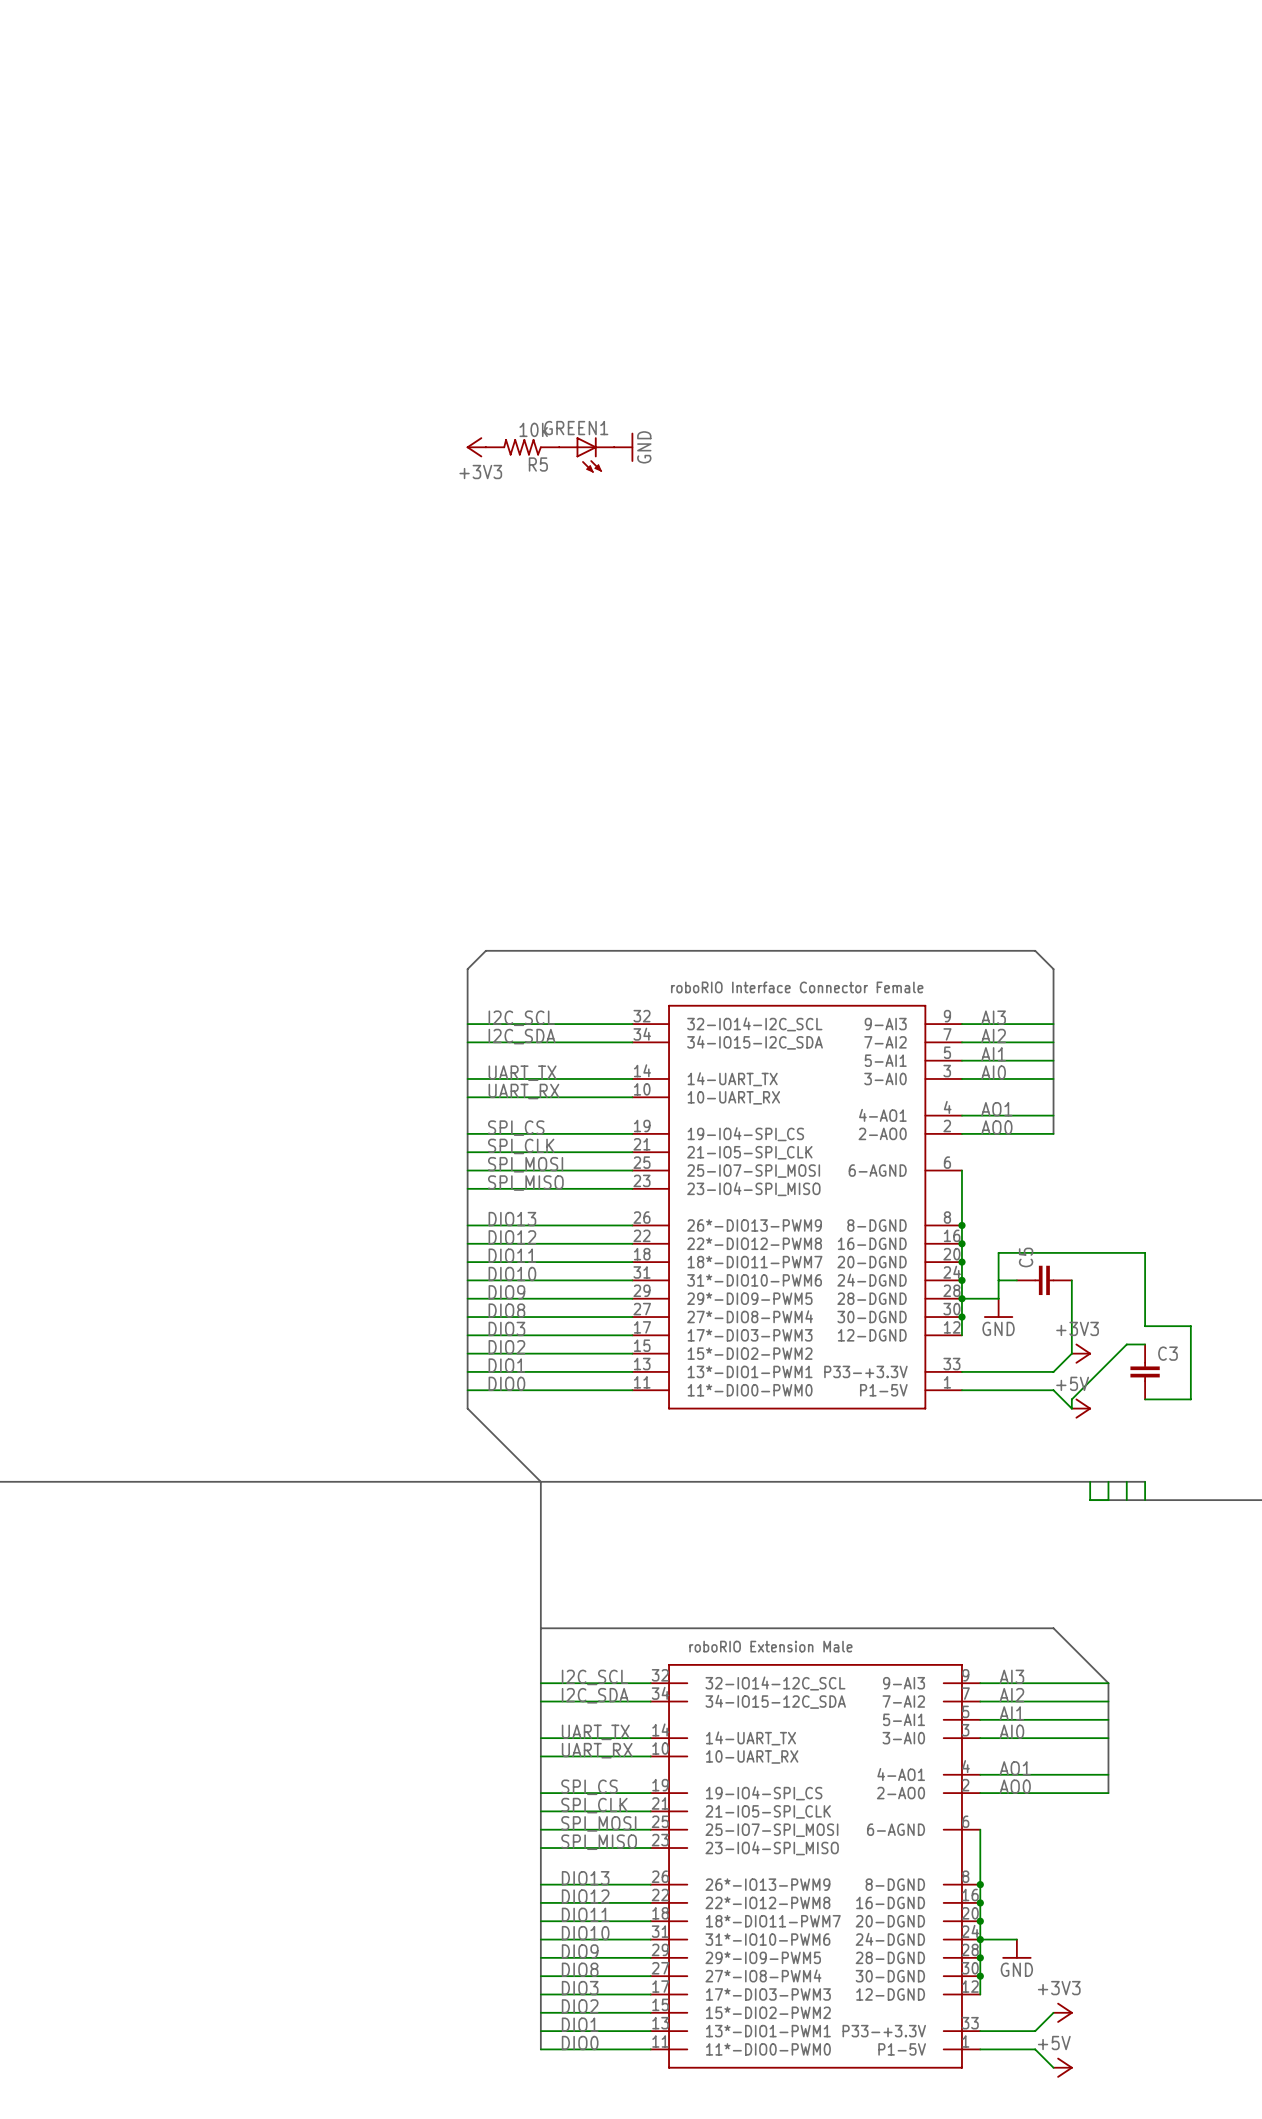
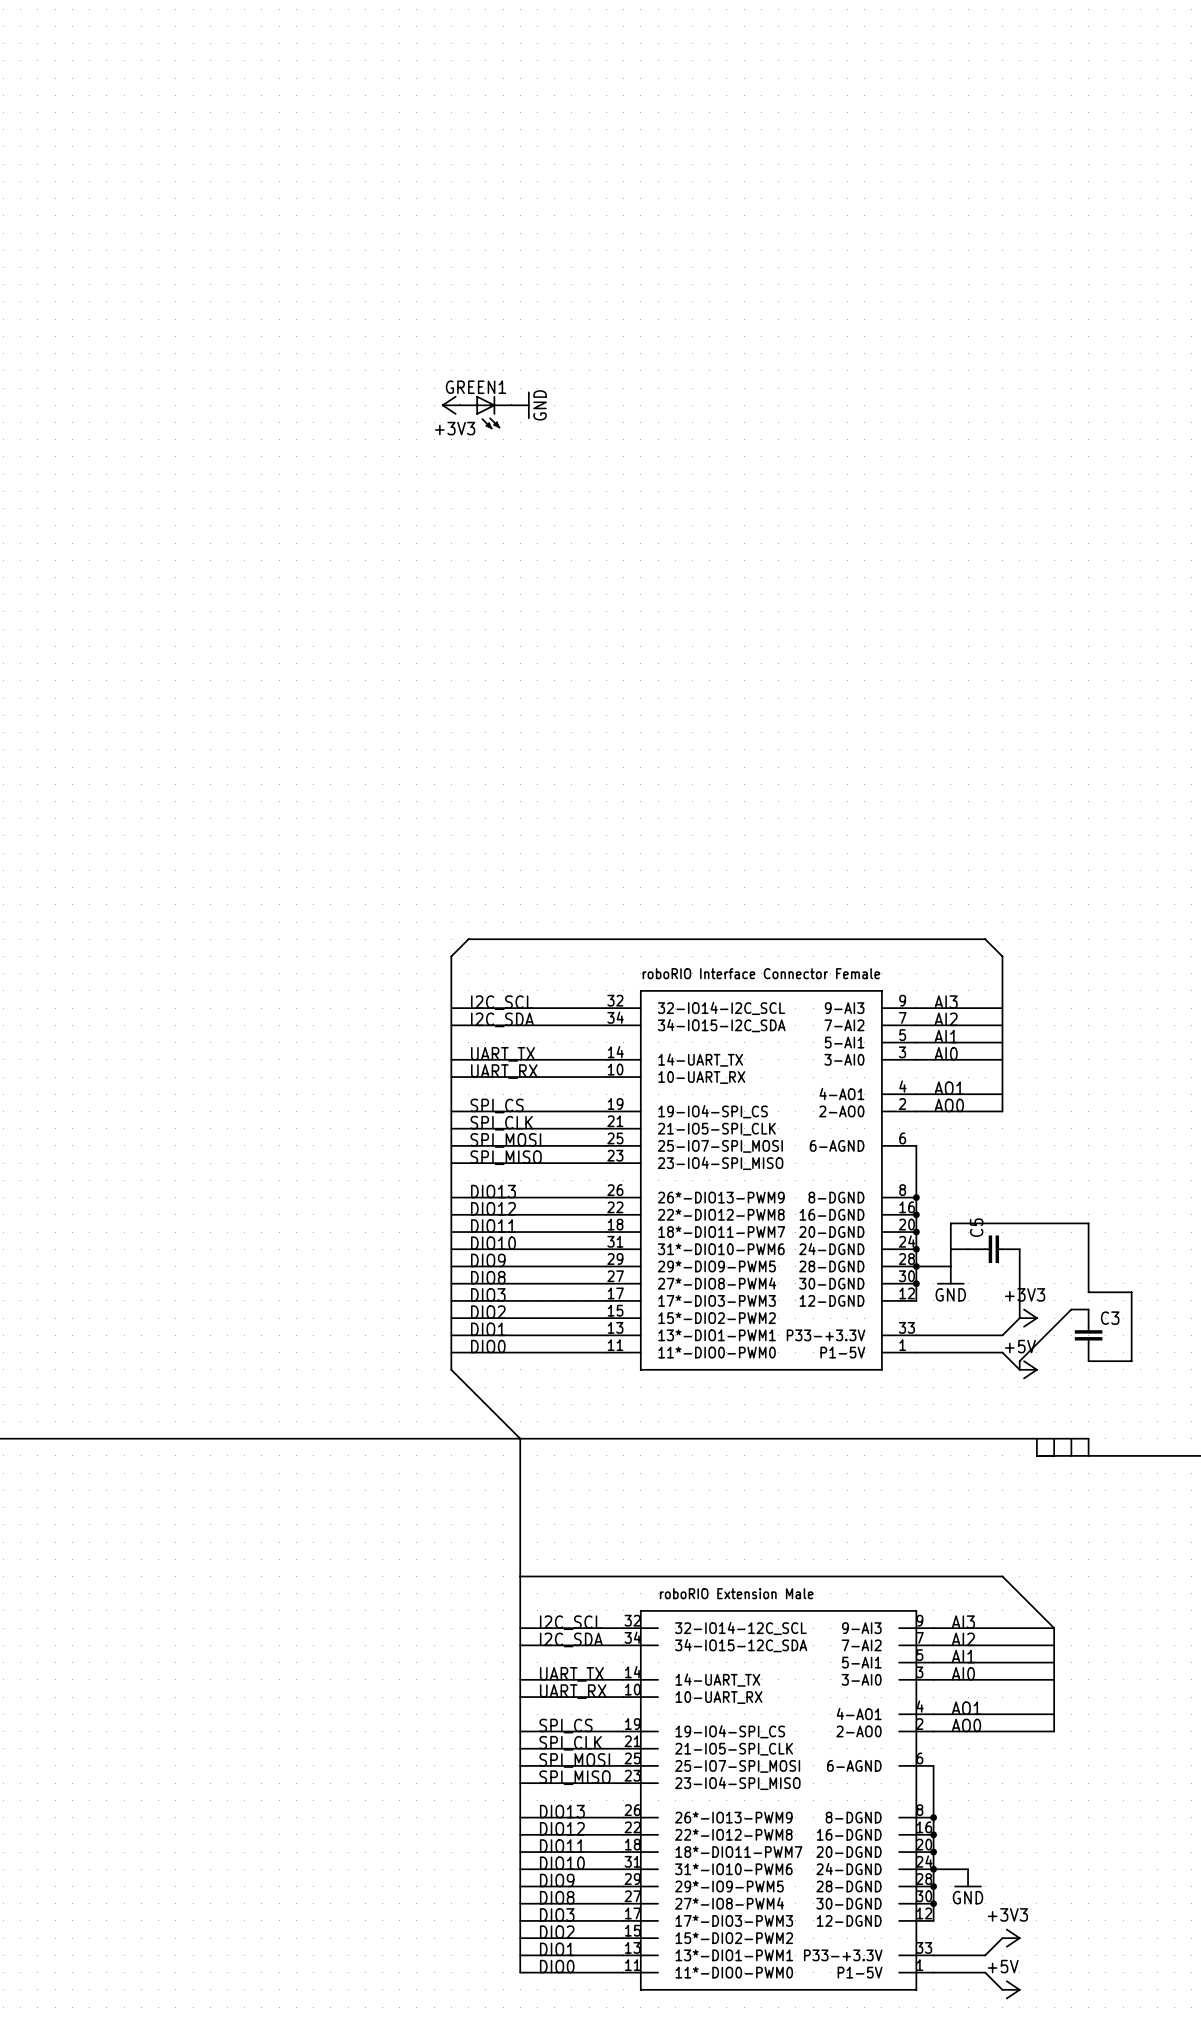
power symbol position: +3V3 (476, 447) -> +3V3 (450, 405)
R5: 10k (522, 447) -> none
power symbol position: GND (623, 447) -> GND (520, 405)
GREEN1 position: (586, 454) -> (485, 412)

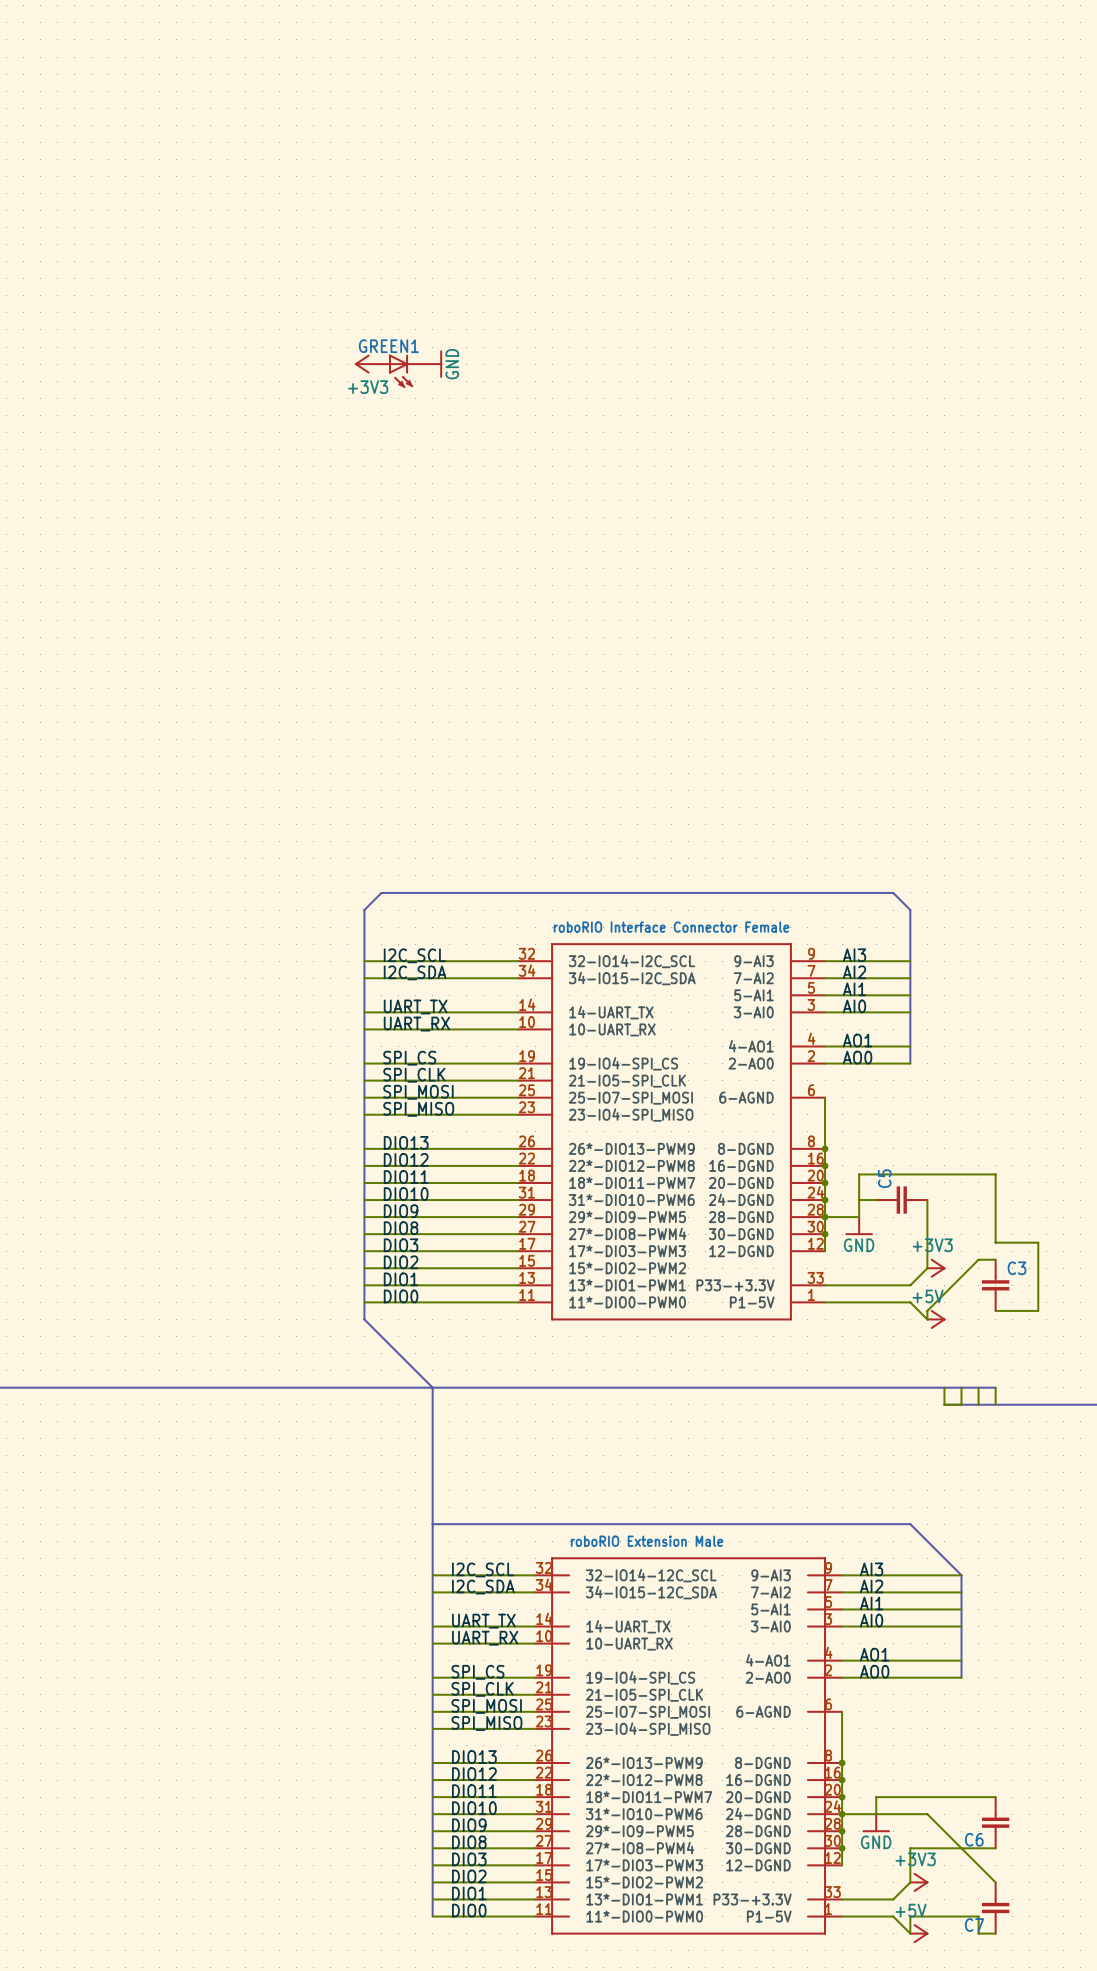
wire: none -> (995, 1797) (876, 1797) (876, 1814) (927, 1814) (995, 1882)
C6: none -> (995, 1822)
wire: none -> (995, 1848) (910, 1848) (910, 1882)
C7: none -> (995, 1908)
wire: none -> (910, 1933) (910, 1916) (978, 1916) (978, 1933) (995, 1933)

